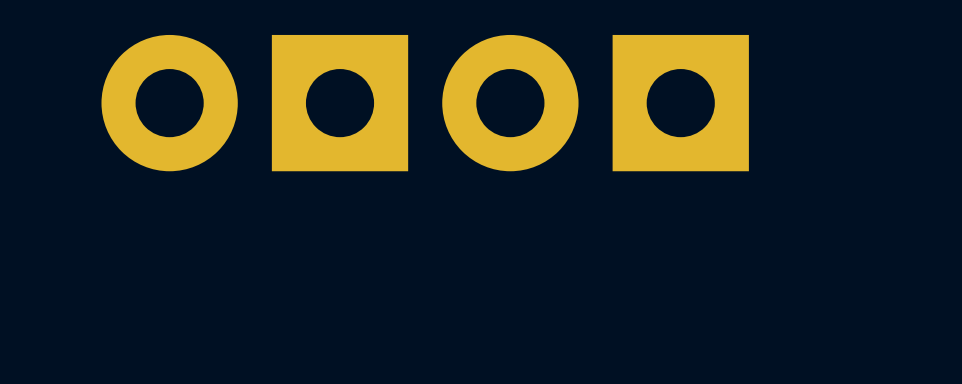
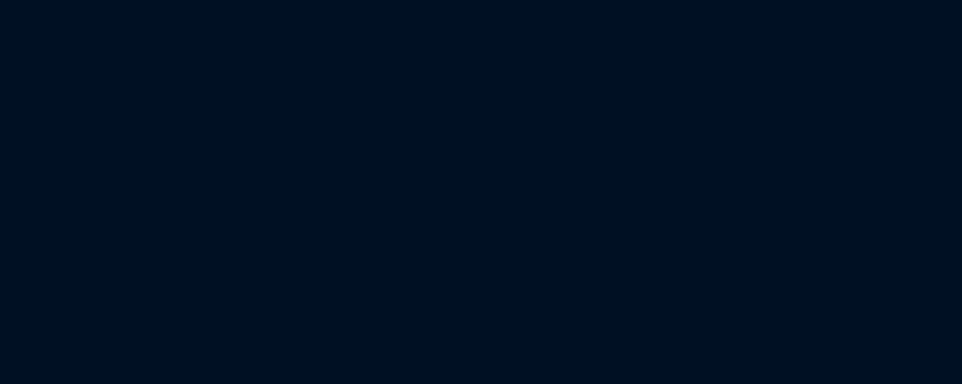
part: (254, 103) -> none
part: (595, 103) -> none

